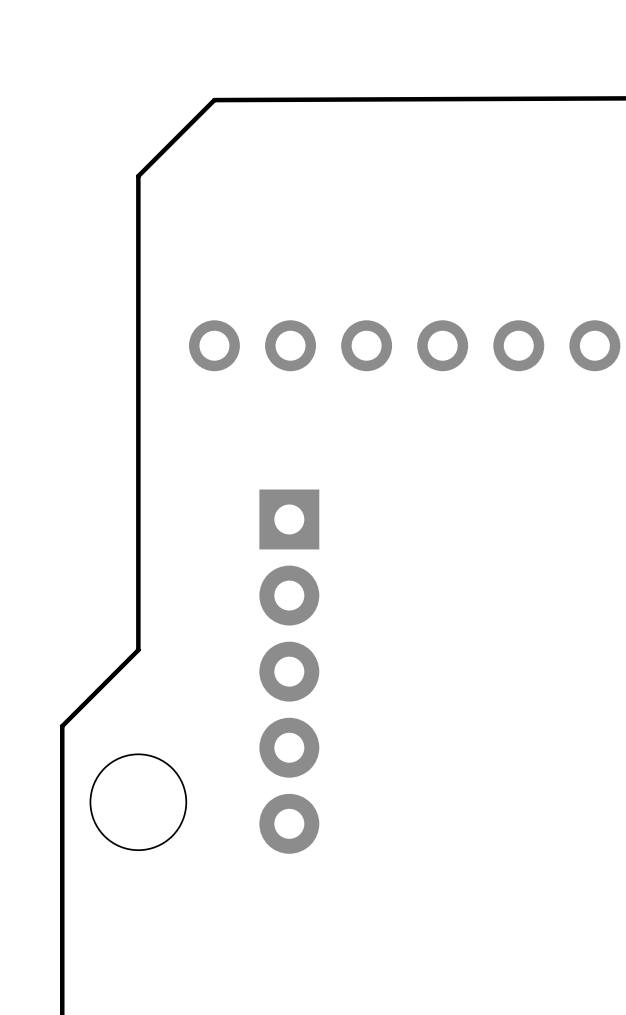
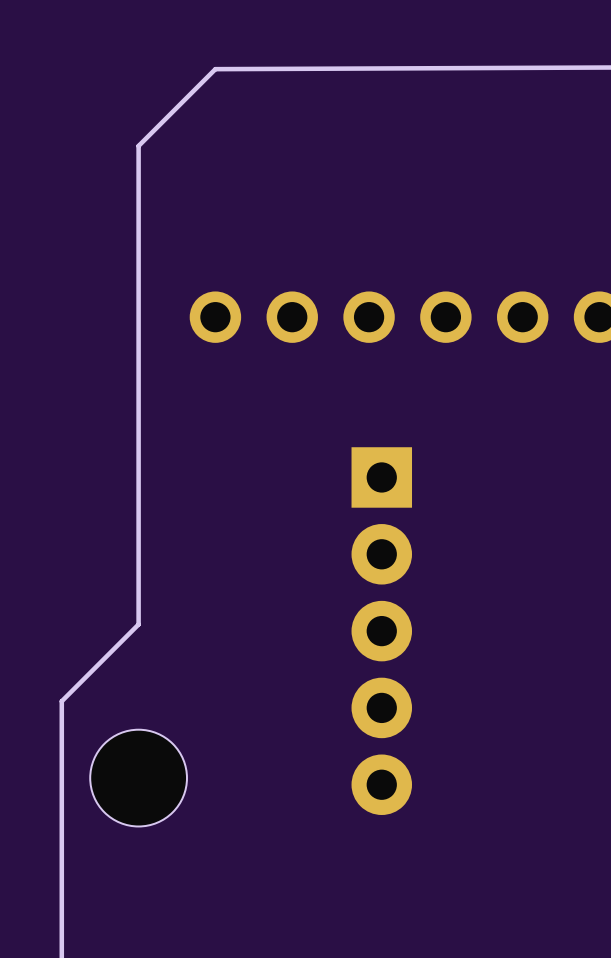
part position: (289, 671) -> (381, 631)

